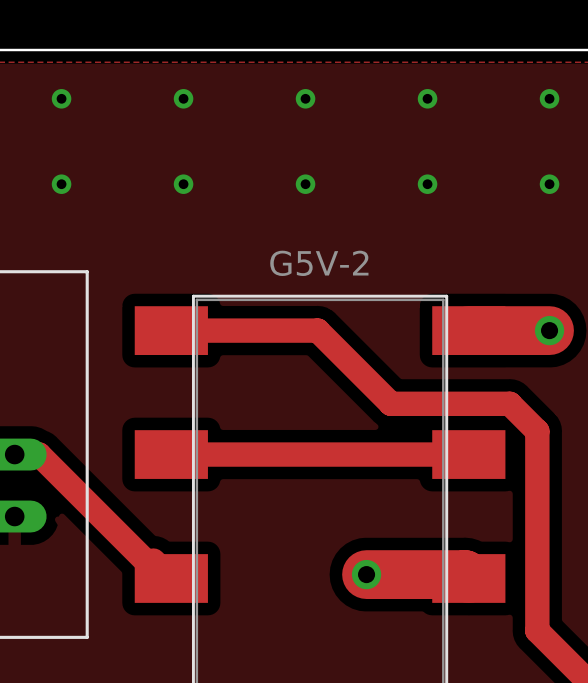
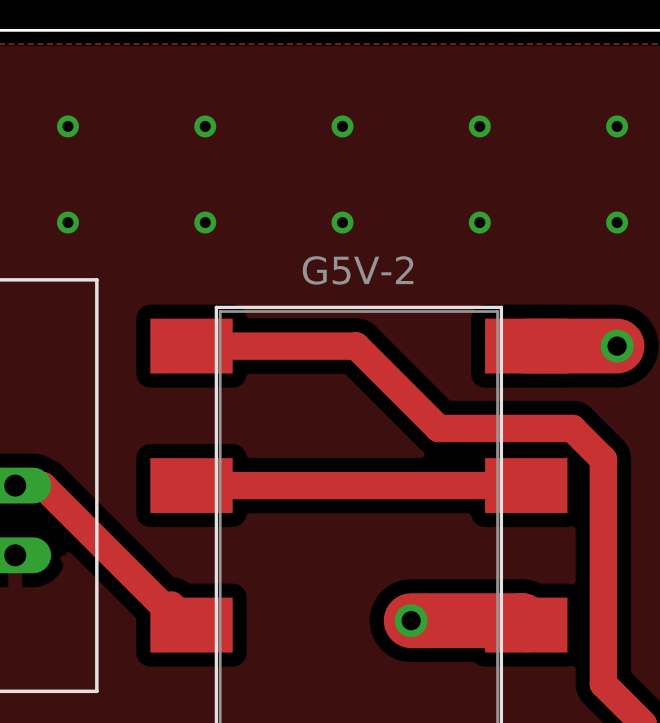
via: (61, 98) -> none
via: (183, 98) -> none
via: (305, 98) -> none
via: (427, 98) -> none
via: (549, 98) -> none
via: none -> (67, 126)
via: none -> (205, 126)
via: none -> (342, 126)
via: none -> (479, 126)
via: none -> (617, 126)
via: (61, 184) -> none
via: (183, 184) -> none
via: (305, 184) -> none
via: (427, 184) -> none
via: (549, 184) -> none
via: none -> (67, 222)
via: none -> (205, 222)
via: none -> (342, 222)
via: none -> (479, 222)
via: none -> (617, 222)

